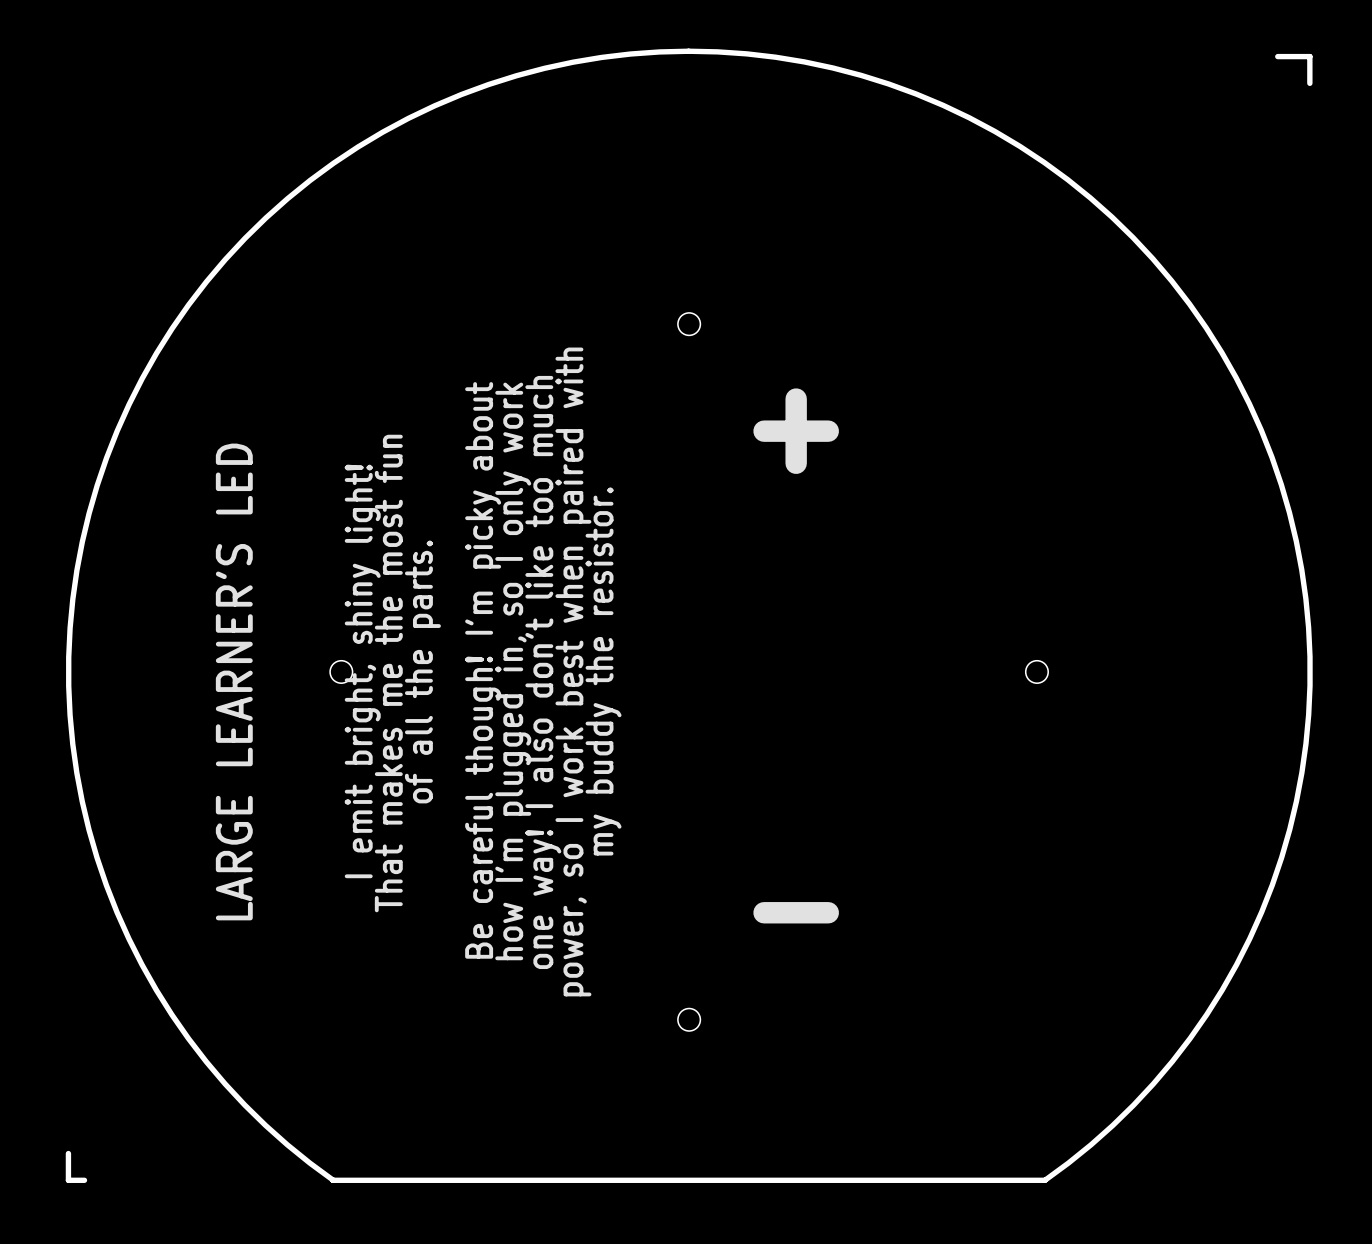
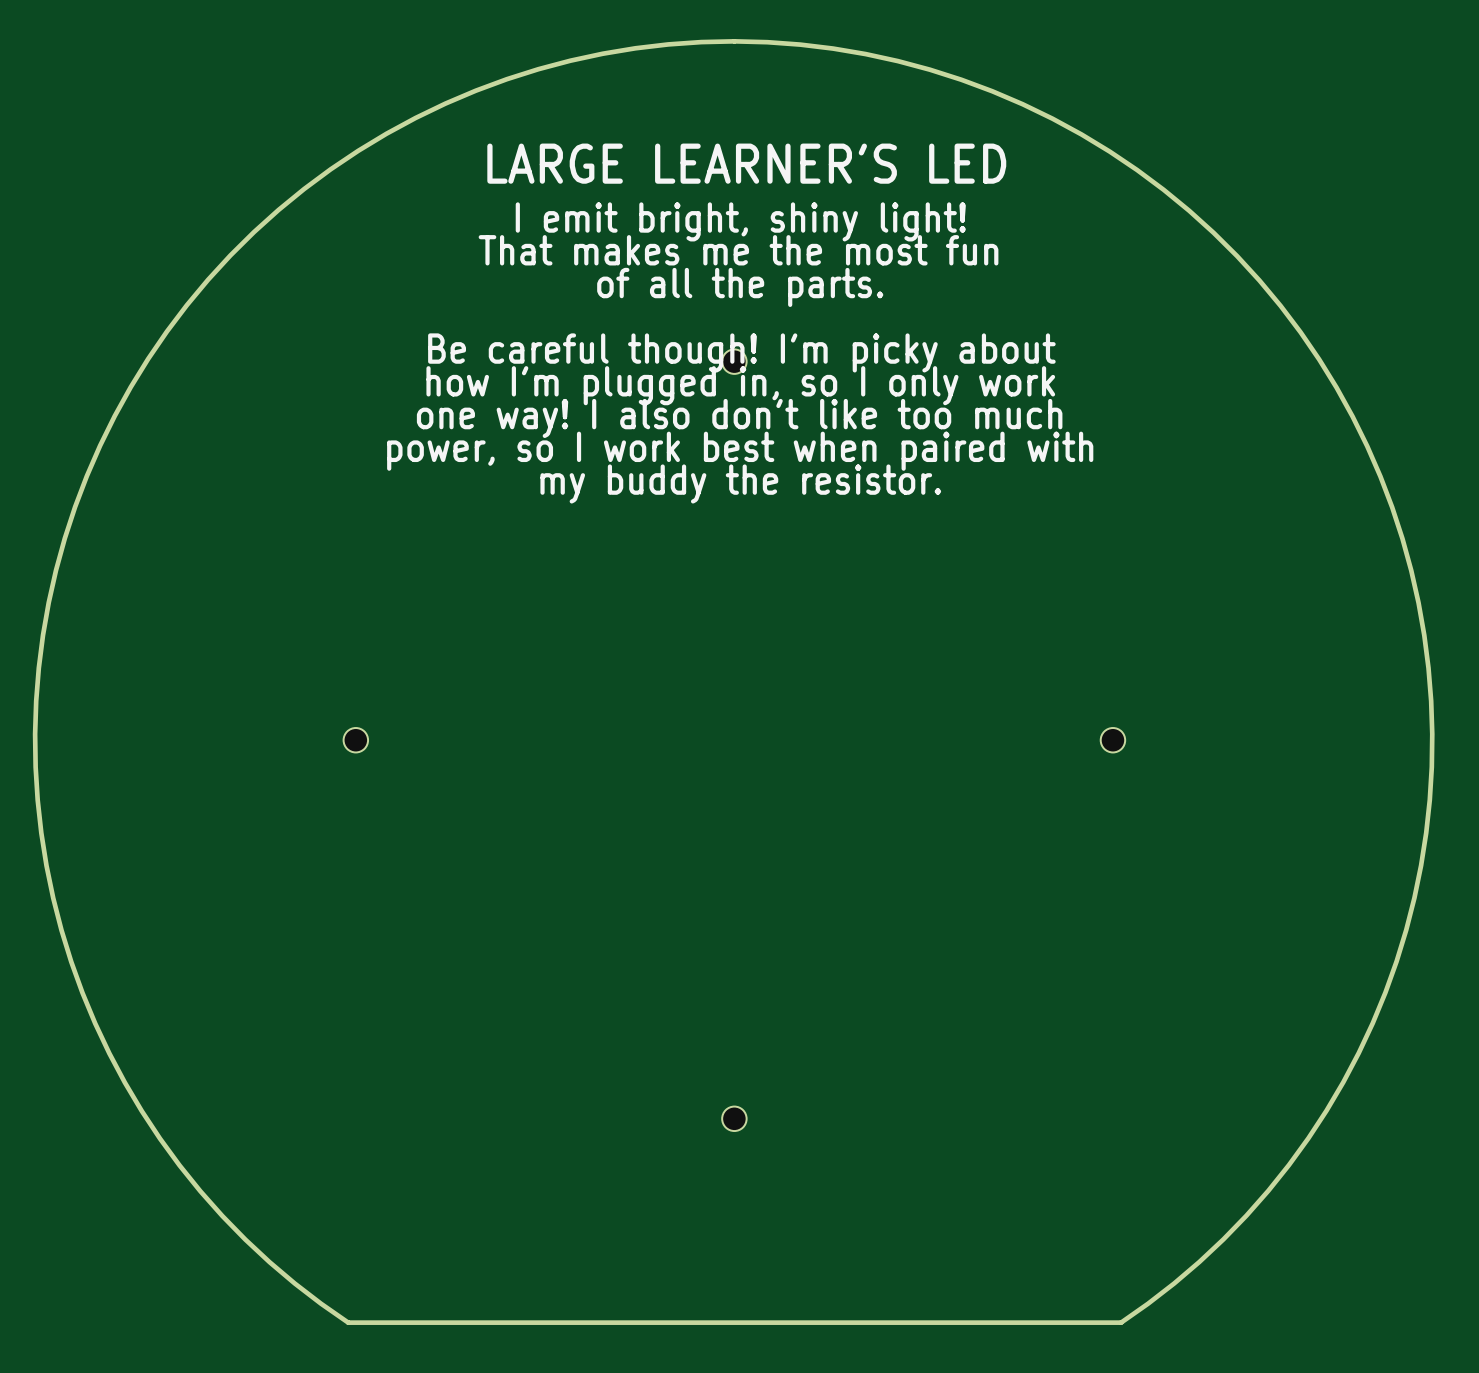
board edge: none -> (734, 41) (767, 42) (833, 48) (898, 61) (929, 69) (992, 91) (1052, 118) (1081, 134) (1137, 170) (1189, 210) (1237, 256) (1259, 280) (1300, 332) (1336, 387) (1367, 446) (1392, 507) (1402, 538) (1418, 602) (1424, 635) (1431, 701) (1431, 767) (1426, 832) (1421, 865) (1406, 929) (1396, 961) (1372, 1023) (1343, 1082) (1326, 1110) (1288, 1165) (1246, 1215) (1223, 1239) (1174, 1283) (1121, 1322) (348, 1322) (294, 1283) (245, 1239) (200, 1191) (160, 1138) (124, 1082) (109, 1053) (82, 992) (61, 930) (46, 865) (37, 800) (35, 767) (36, 700) (38, 667) (48, 602) (64, 538) (86, 476) (114, 416) (130, 387) (166, 331) (208, 279) (230, 255) (278, 209) (304, 189) (358, 150) (415, 117) (445, 103) (506, 79) (570, 60) (602, 53) (668, 44) (734, 41)
board edge: (1277, 56) (1309, 56) (1309, 83) -> none
text: none -> LARGE LEARNER'S LED (746, 163)
text: none -> I emit bright, shiny light! (740, 221)
text: none -> That makes me the most fun (738, 250)
line: (796, 399) (796, 463) -> none
line: (828, 431) (764, 431) -> none
text rotation: 0° (483, 670) -> 90° clockwise (741, 352)
text: I emit bright, shiny light! (362, 671) -> none
text rotation: 0° (422, 671) -> 90° clockwise (740, 287)
text position: of all the parts. (422, 671) -> of all the parts. (740, 287)
text rotation: 0° (513, 671) -> 90° clockwise (740, 385)
text rotation: 0° (573, 671) -> 90° clockwise (740, 451)
text rotation: 0° (603, 671) -> 90° clockwise (740, 483)
text rotation: 0° (543, 672) -> 90° clockwise (739, 418)
text: That makes me the most fun (388, 673) -> none
text: LARGE LEARNER'S LED (234, 681) -> none
line: (828, 912) (764, 912) -> none
board edge: (68, 1153) (68, 1180) (84, 1180) -> none
board edge: (333, 1180) (309, 1163) (287, 1144) (244, 1105) (188, 1038) (156, 990) (128, 938) (106, 885) (88, 829) (76, 772) (70, 715) (68, 657) (76, 570) (89, 513) (106, 458) (129, 404) (156, 353) (188, 304) (225, 259) (265, 217) (310, 180) (357, 147) (408, 118) (461, 94) (516, 75) (601, 57) (659, 51) (717, 51) (775, 57) (832, 67) (888, 84) (942, 105) (994, 131) (1044, 162) (1090, 197) (1133, 237) (1189, 304) (1221, 352) (1249, 403) (1271, 457) (1289, 512) (1301, 569) (1308, 627) (1308, 714) (1301, 772) (1289, 829) (1272, 885) (1249, 938) (1222, 990) (1190, 1038) (1133, 1105) (1091, 1144) (1044, 1180) (332, 1180) -> none

